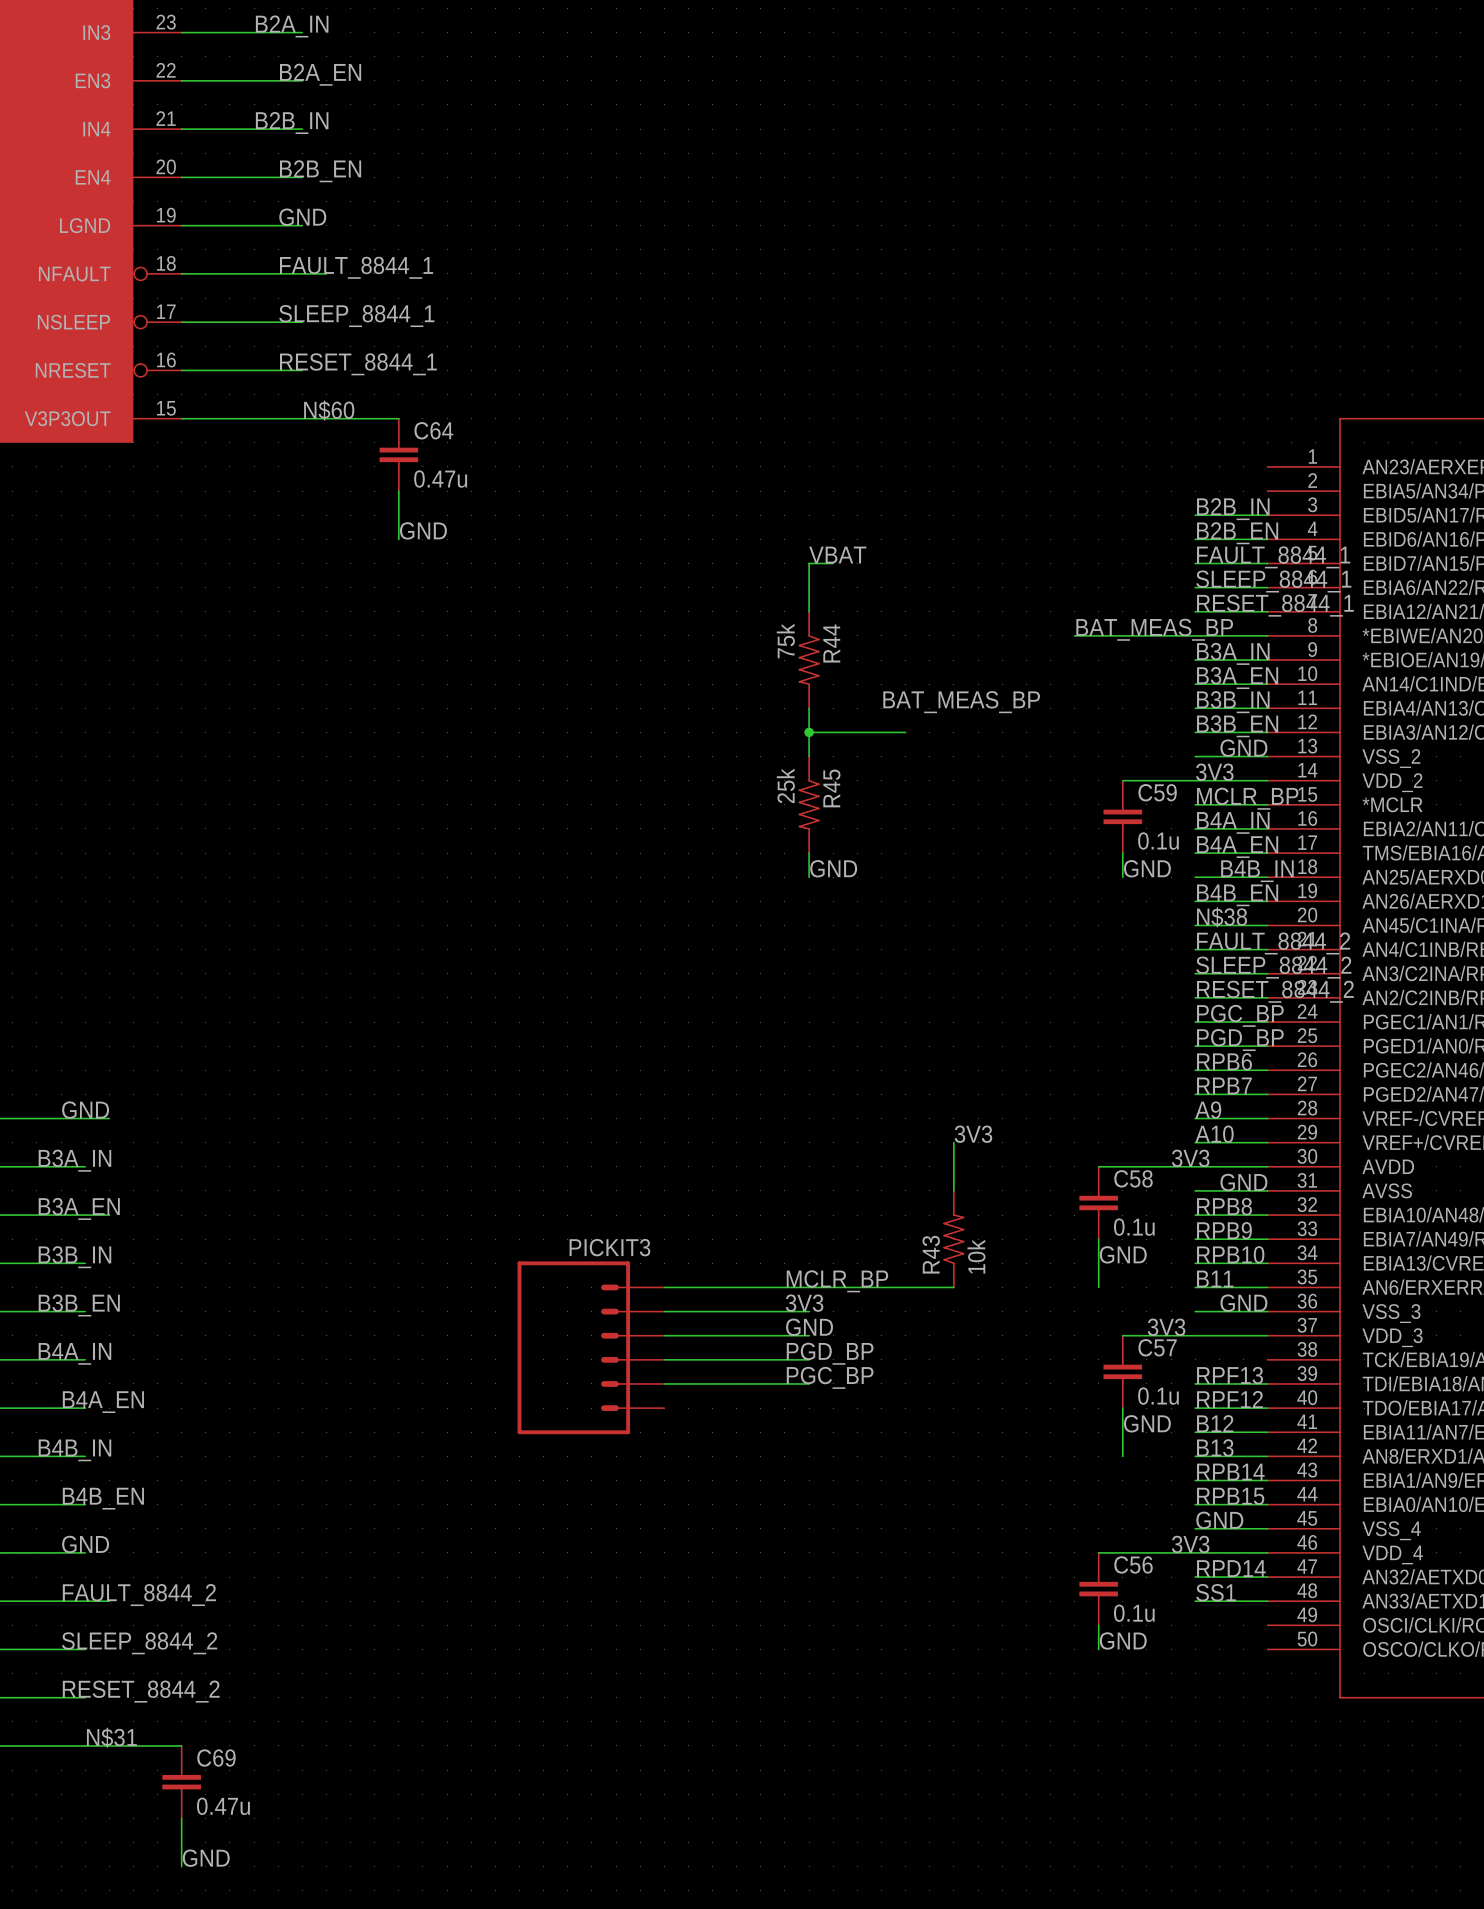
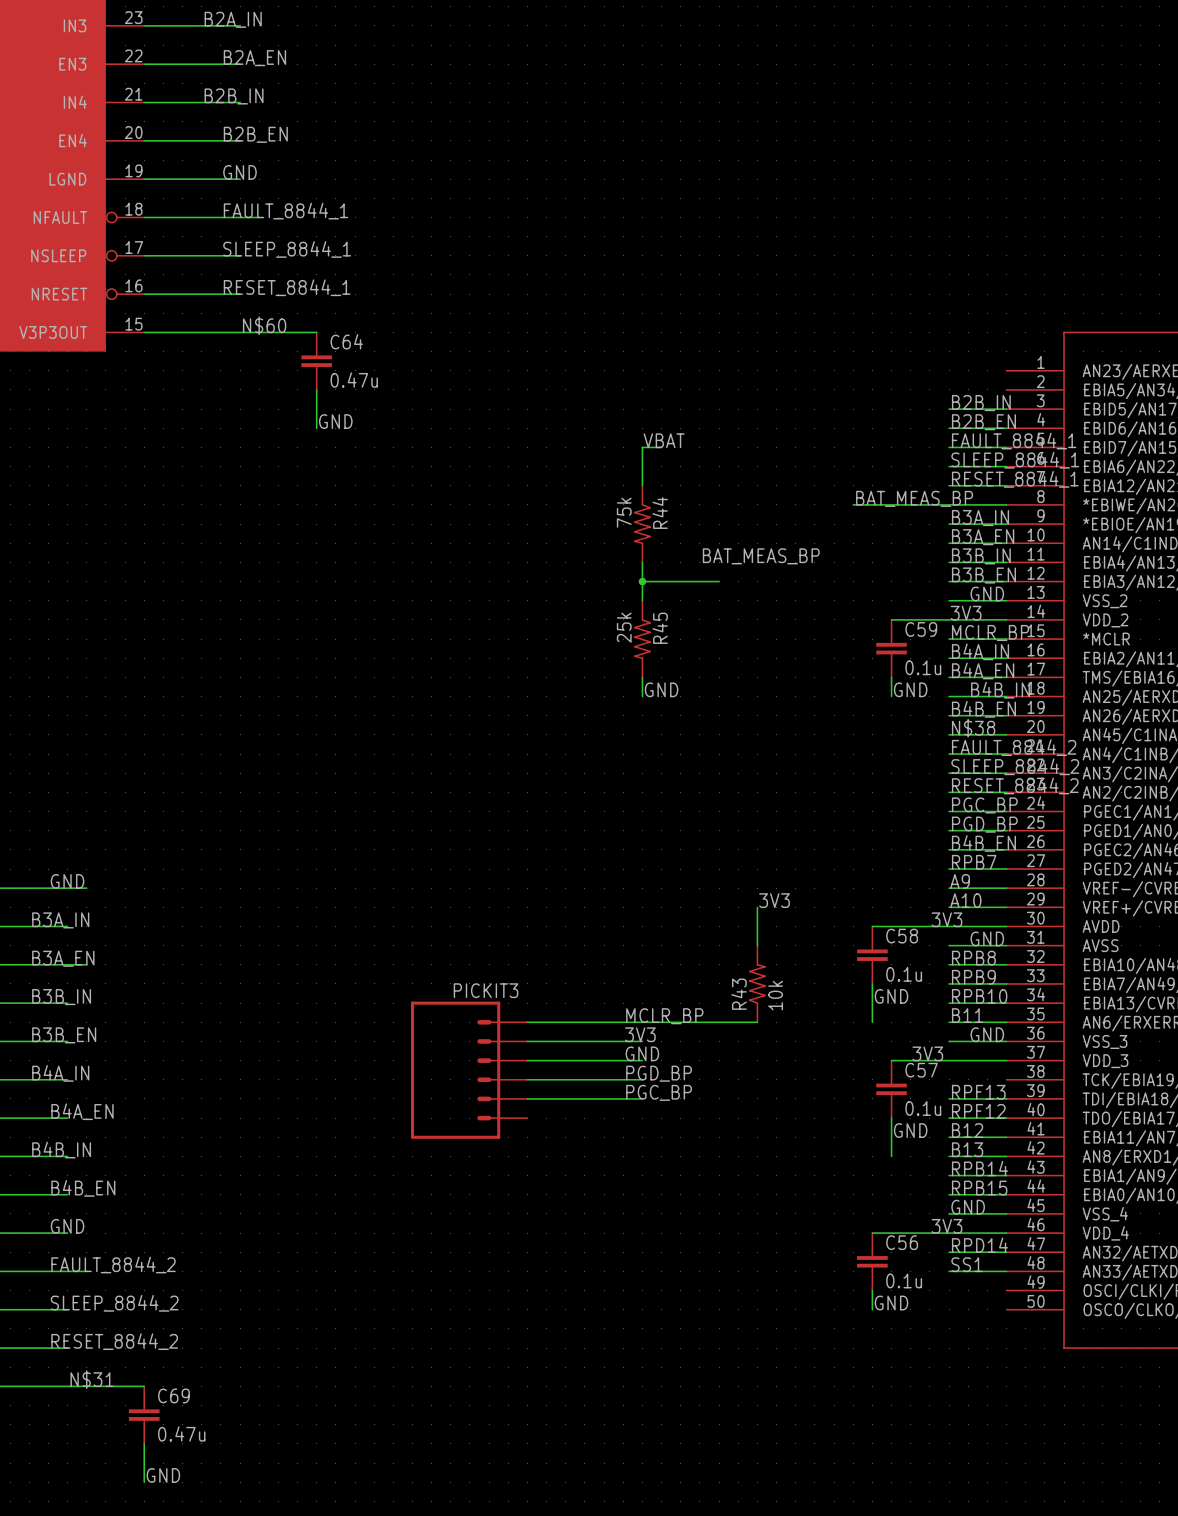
label: RPB6 (1224, 1061) -> B4B_EN (983, 843)

